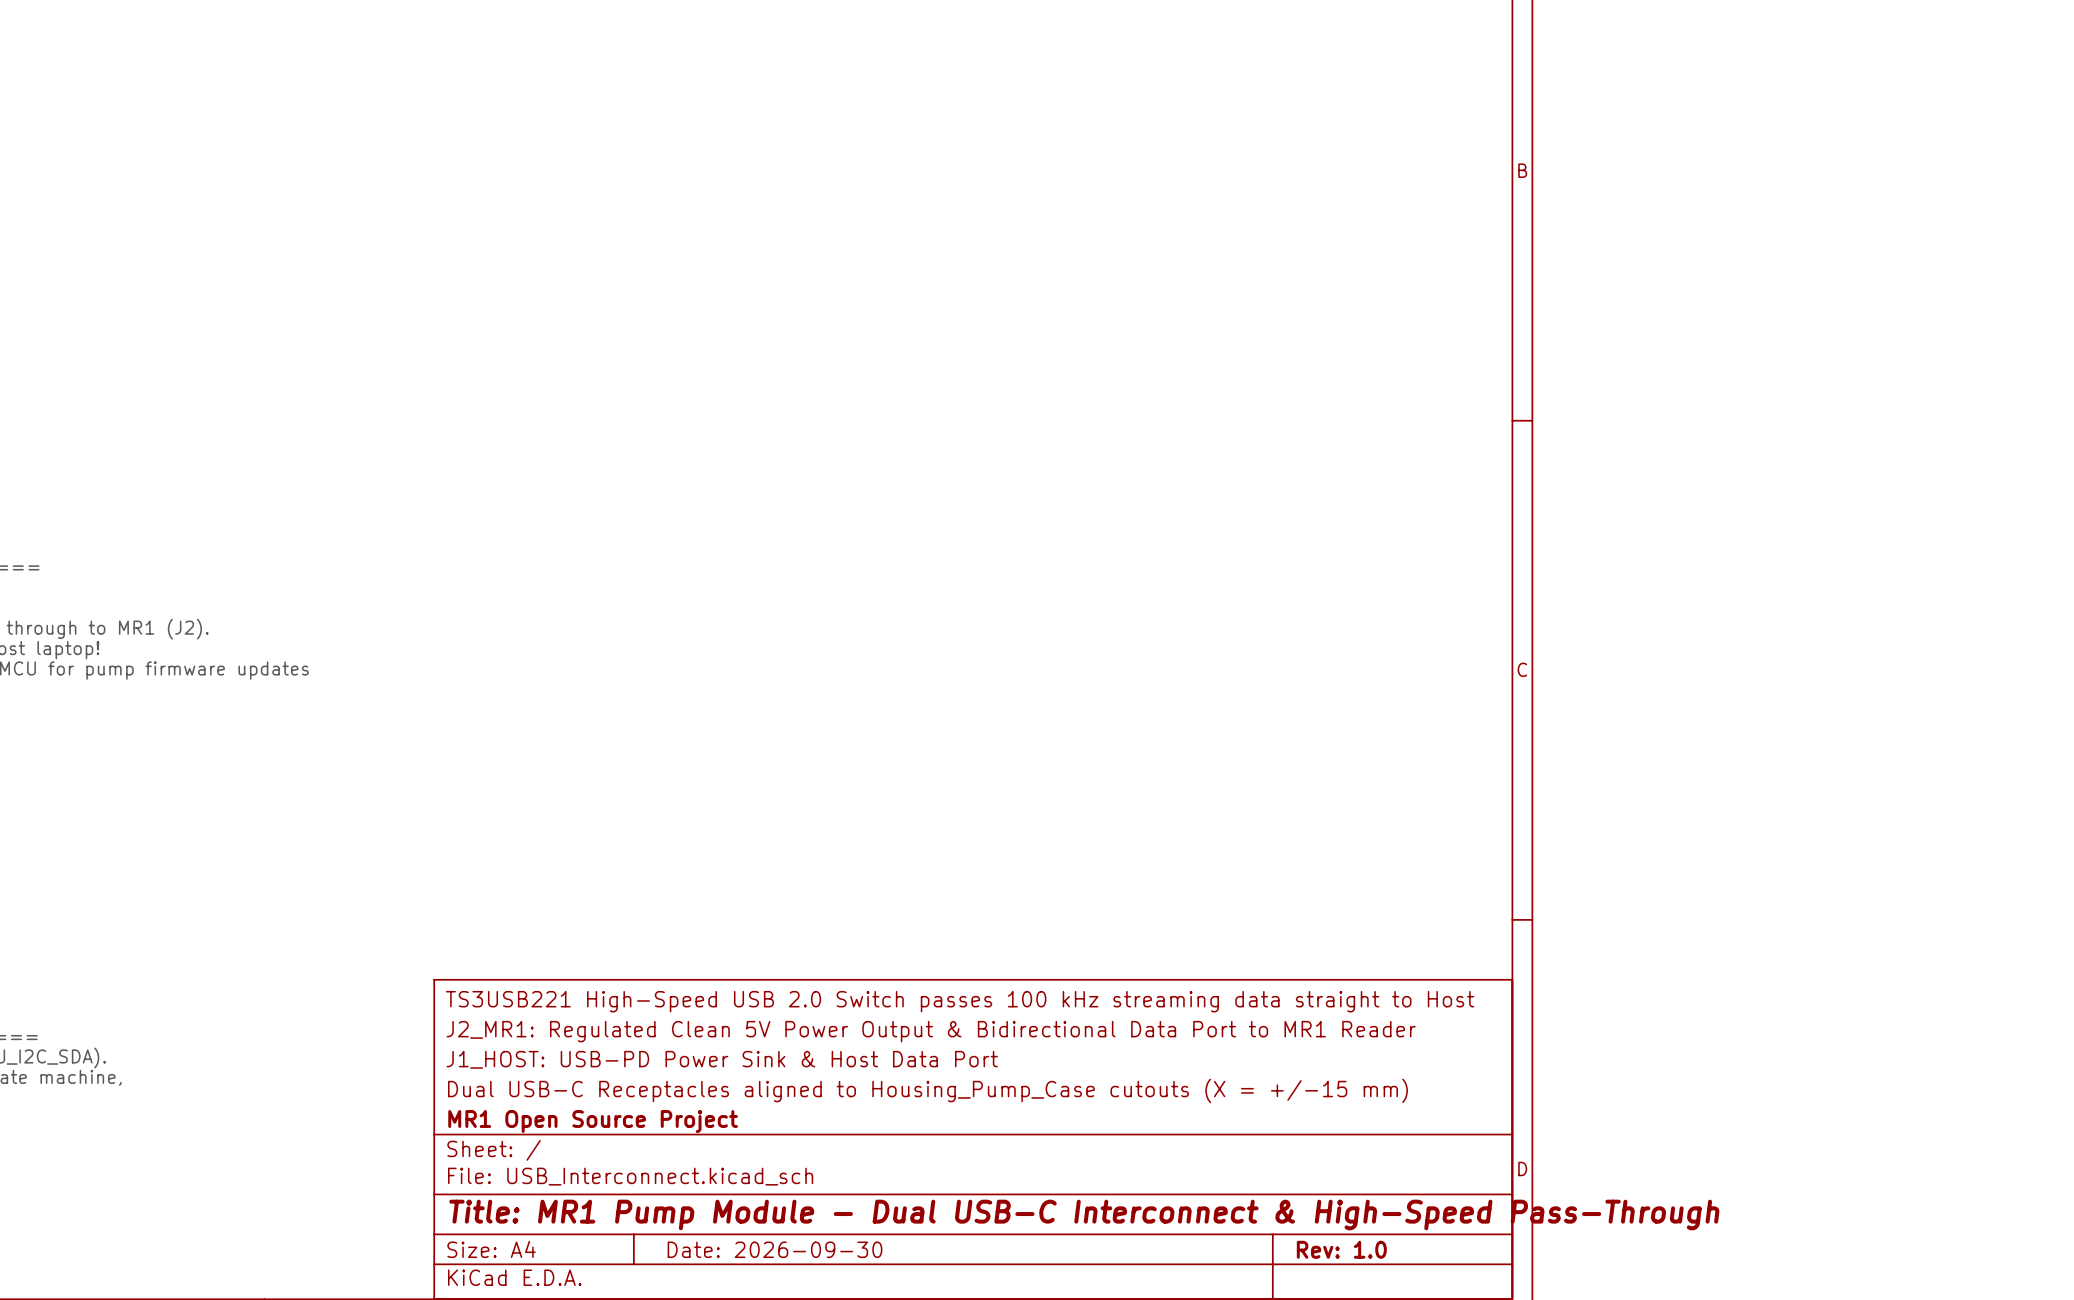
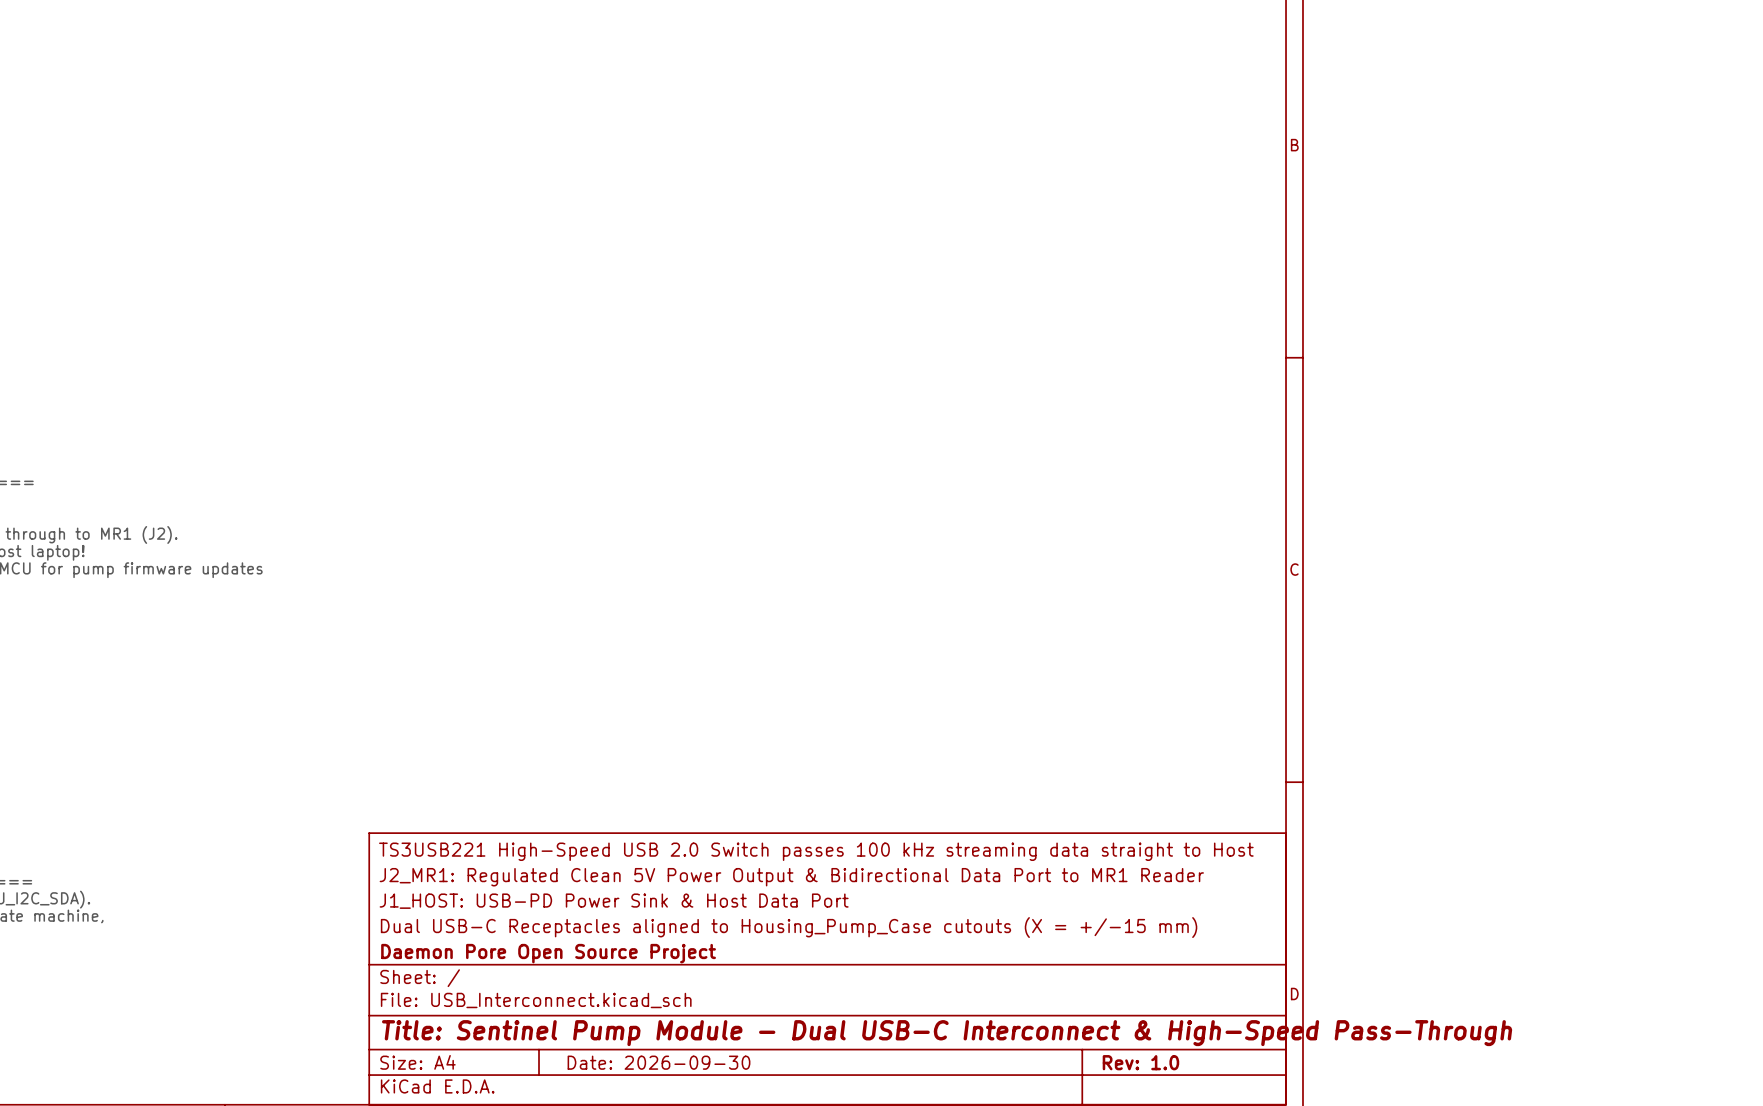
title block: MR1 Open Source Project (593, 1121) -> Daemon Pore Open Source Project (548, 953)
title block: Title: MR1 Pump Module - Dual USB-C Interconnect & High-Speed Pass-Through (1084, 1214) -> Title: Sentinel Pump Module - Dual USB-C Interconnect & High-Speed Pass-Through (947, 1033)

